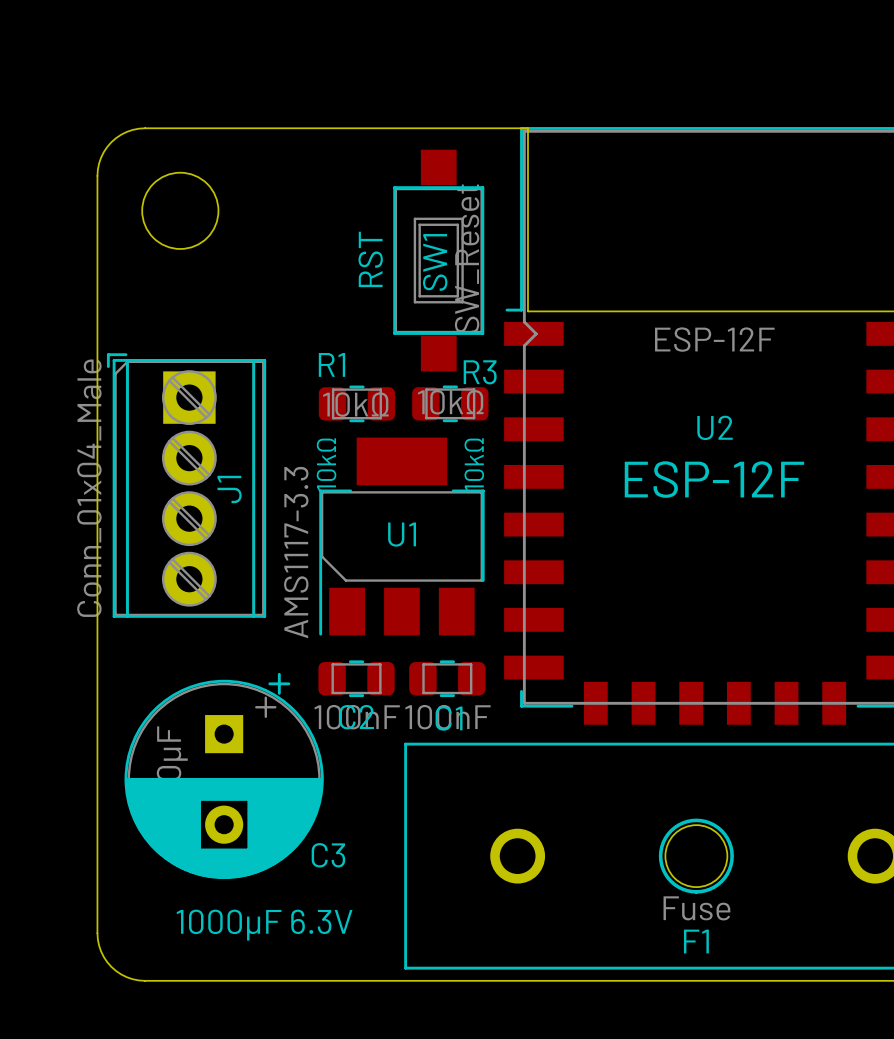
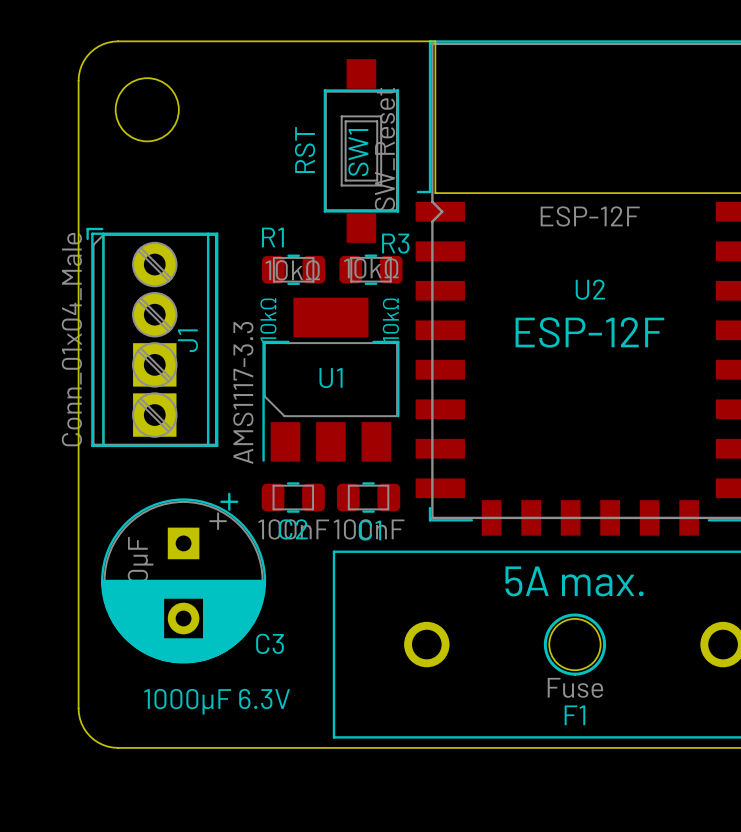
J1 footprint: [106, 353, 267, 618] -> [86, 227, 219, 448]
text: none -> 5A max. (574, 581)

